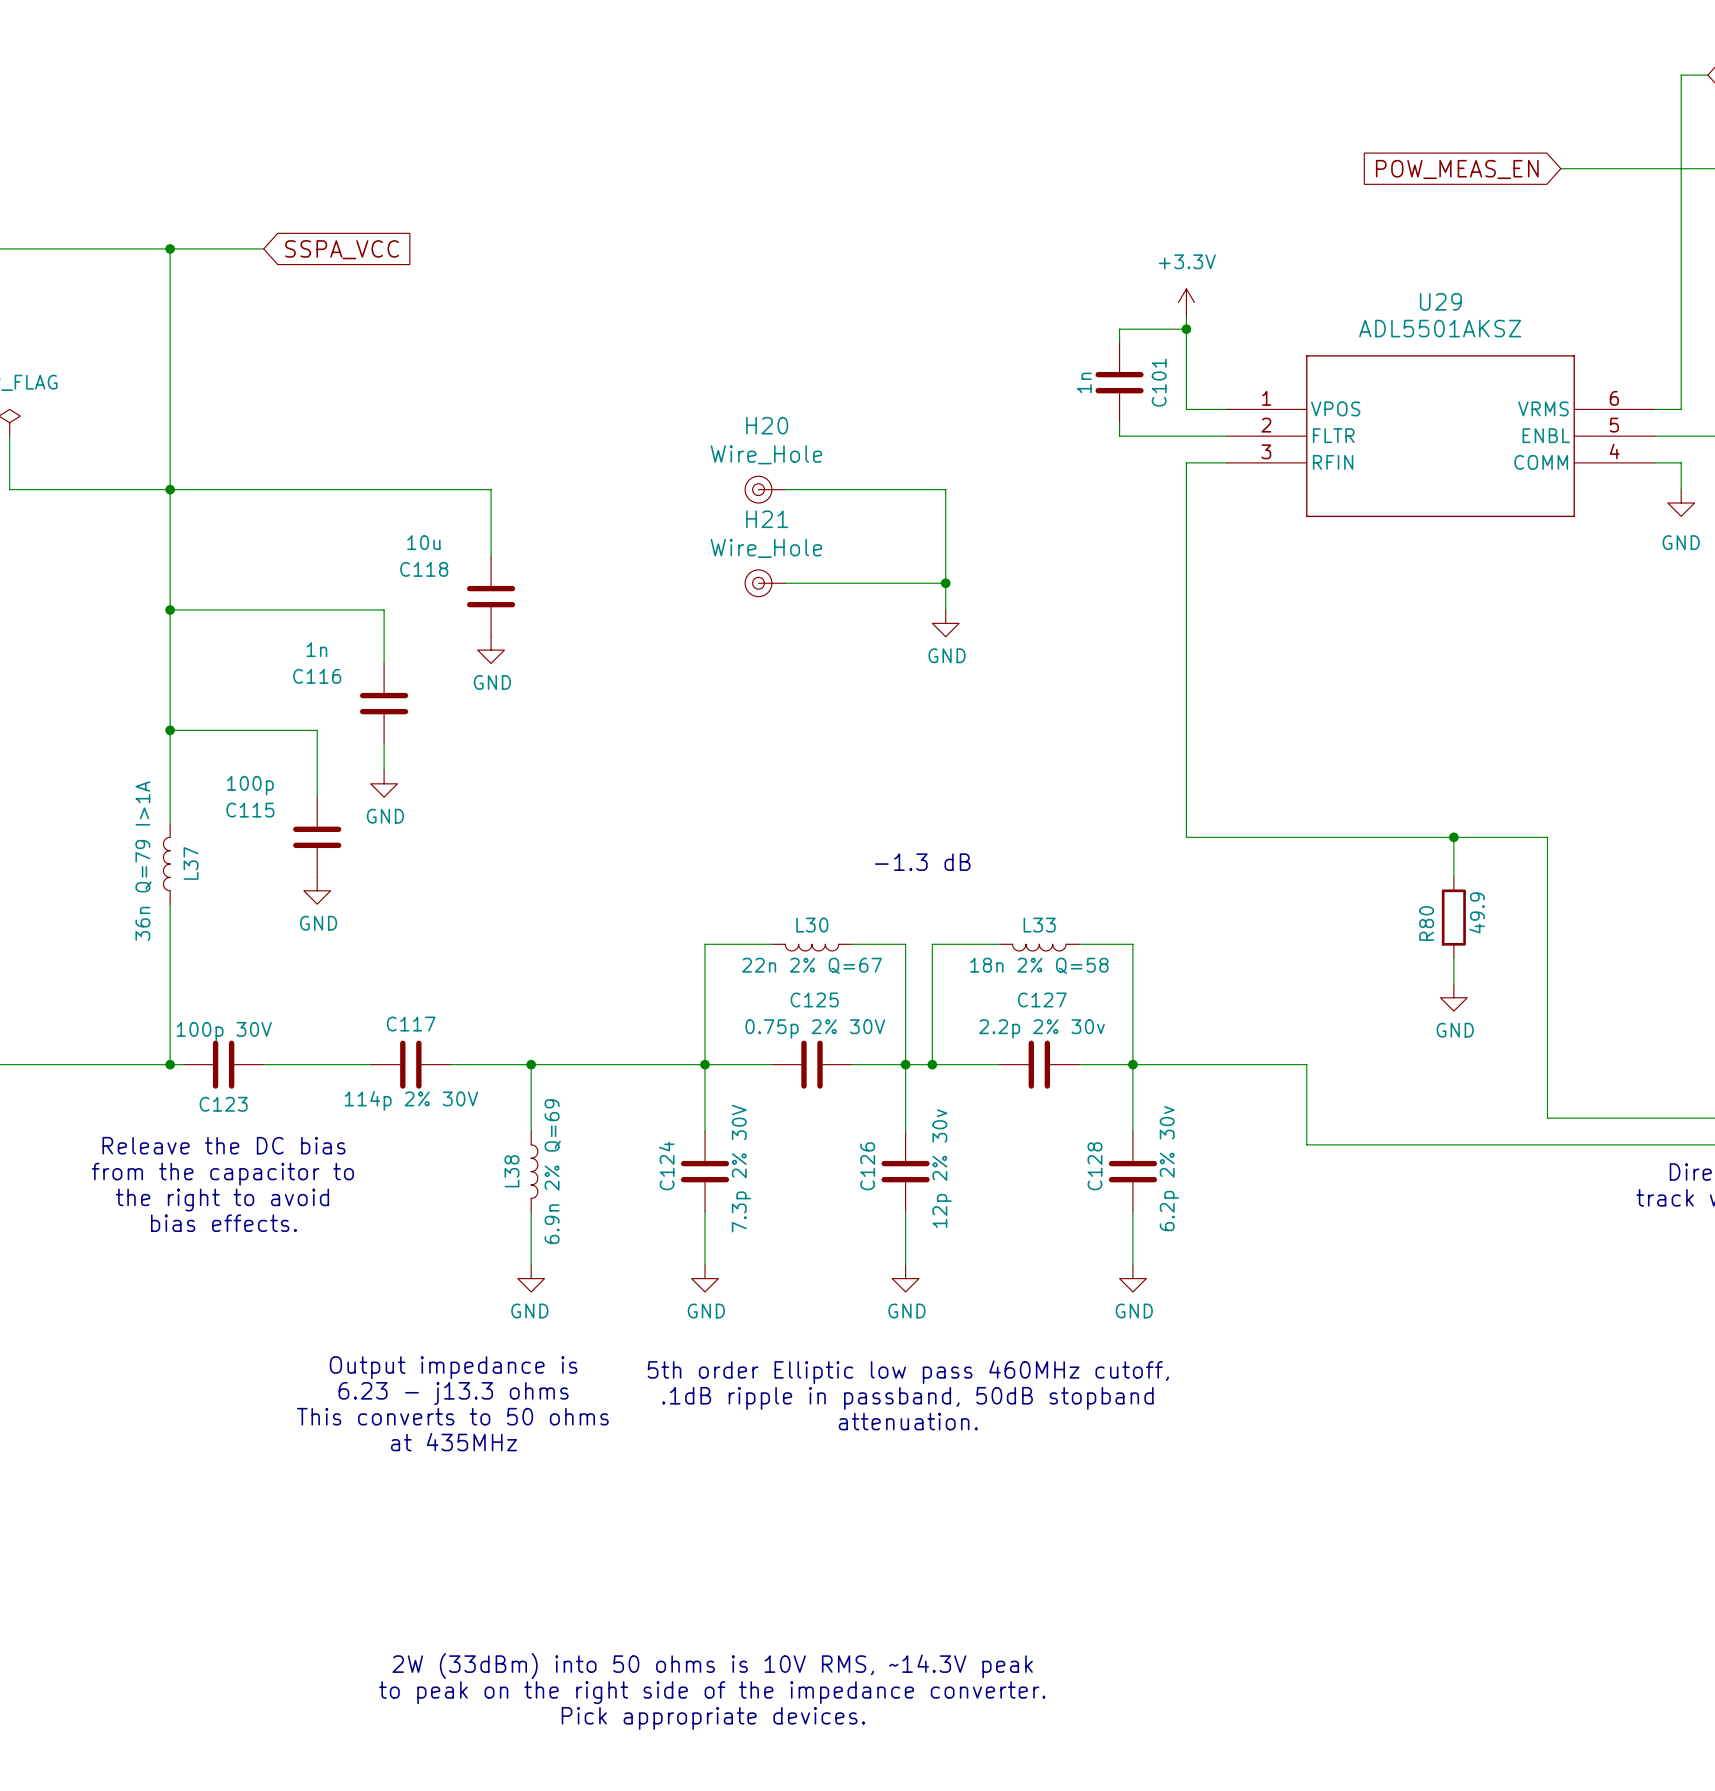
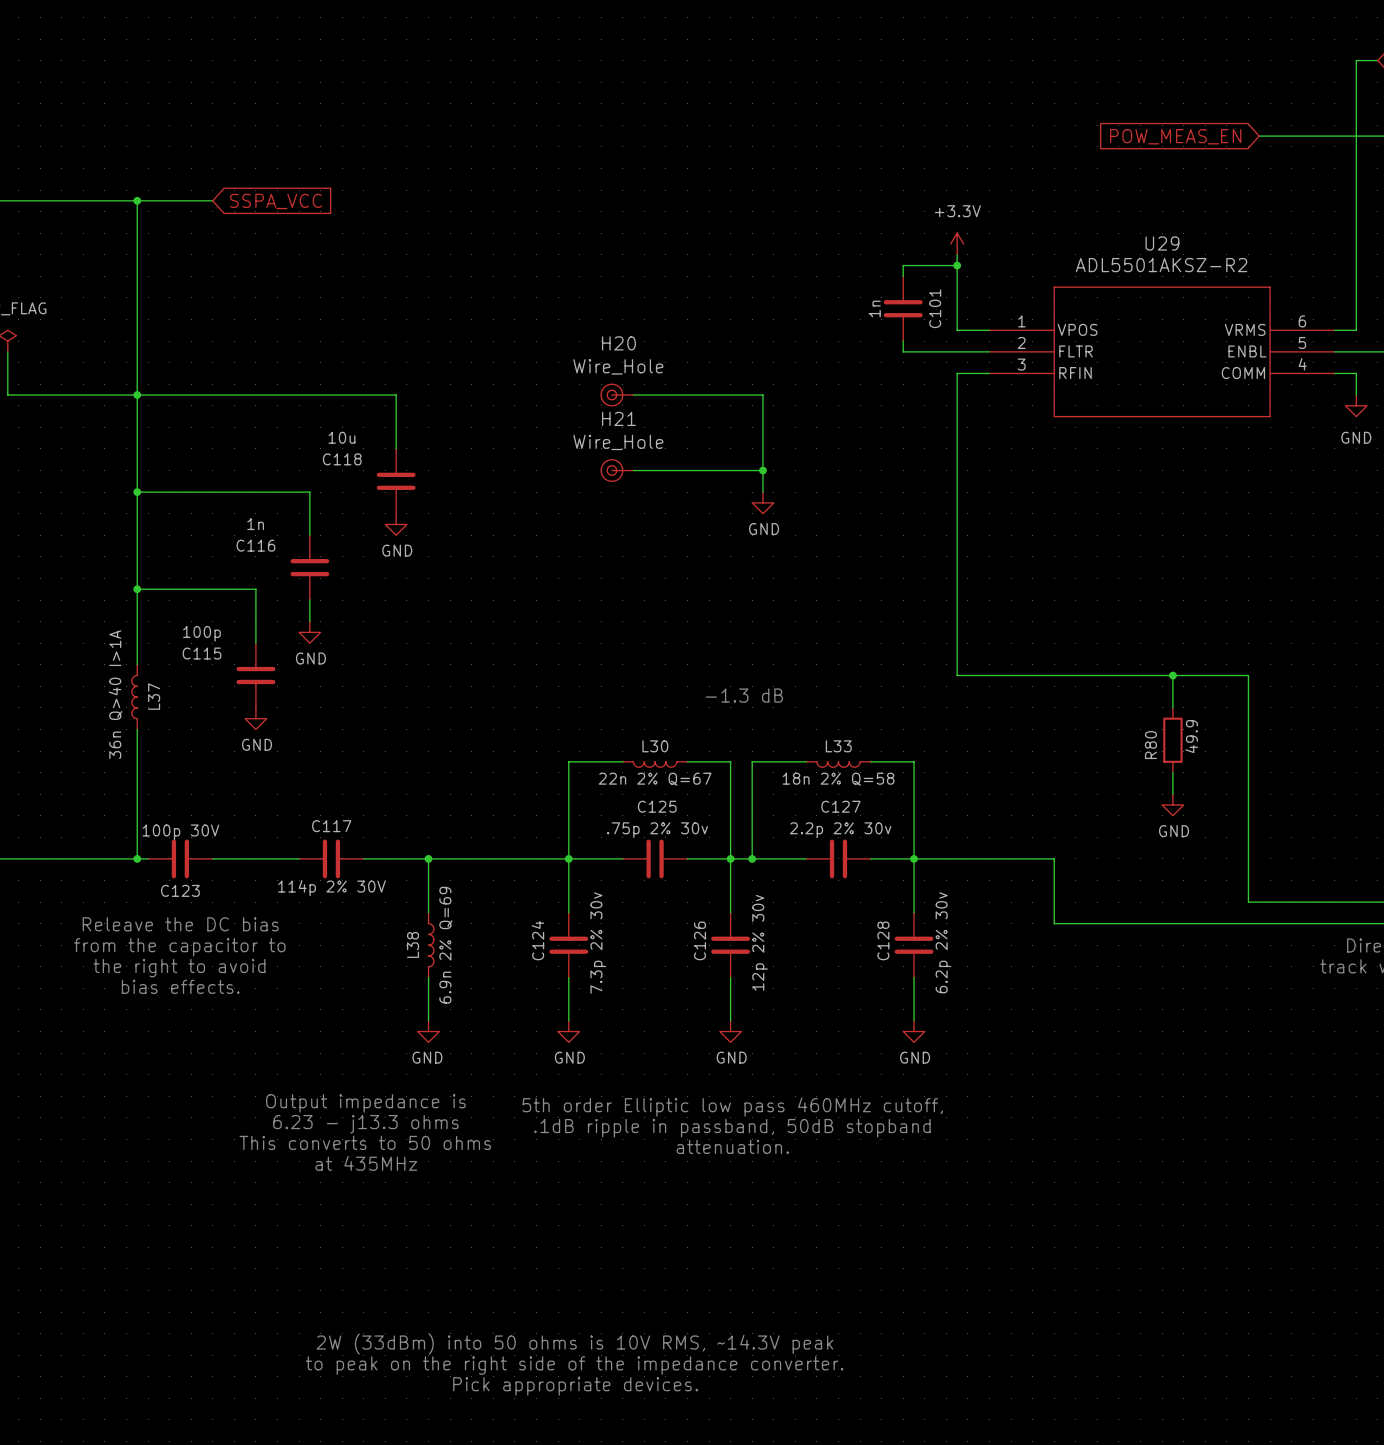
U29 value: ADL5501AKSZ (1440, 328) -> ADL5501AKSZ-R2 (1161, 265)
L37 value: 36n Q=79 I>1A (143, 861) -> 36n Q>40 I>1A (115, 694)
C125 value: 0.75p 2% 30V (815, 1028) -> .75p 2% 30v (657, 830)
C124 value: 7.3p 2% 30V (741, 1168) -> 7.3p 2% 30v (598, 943)

